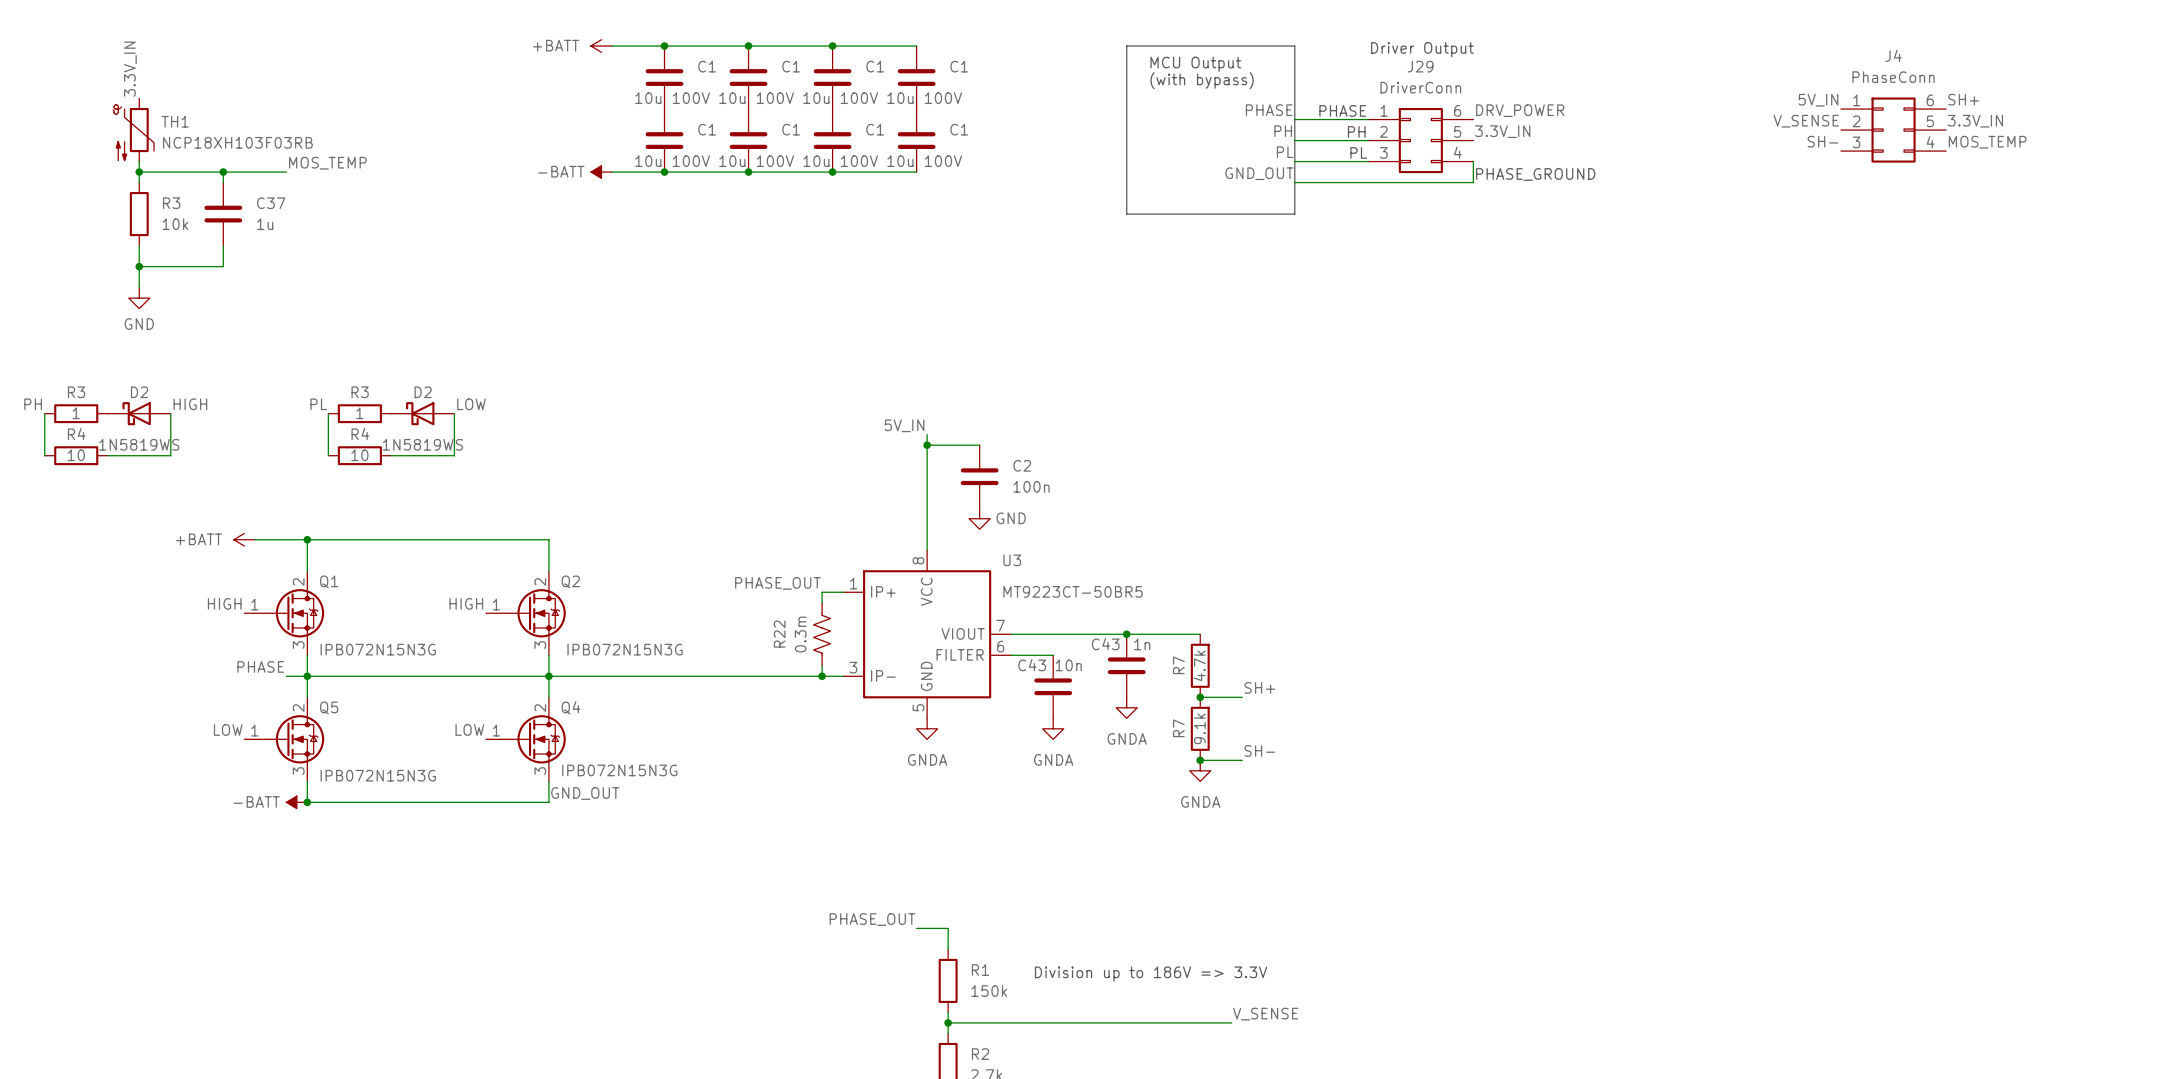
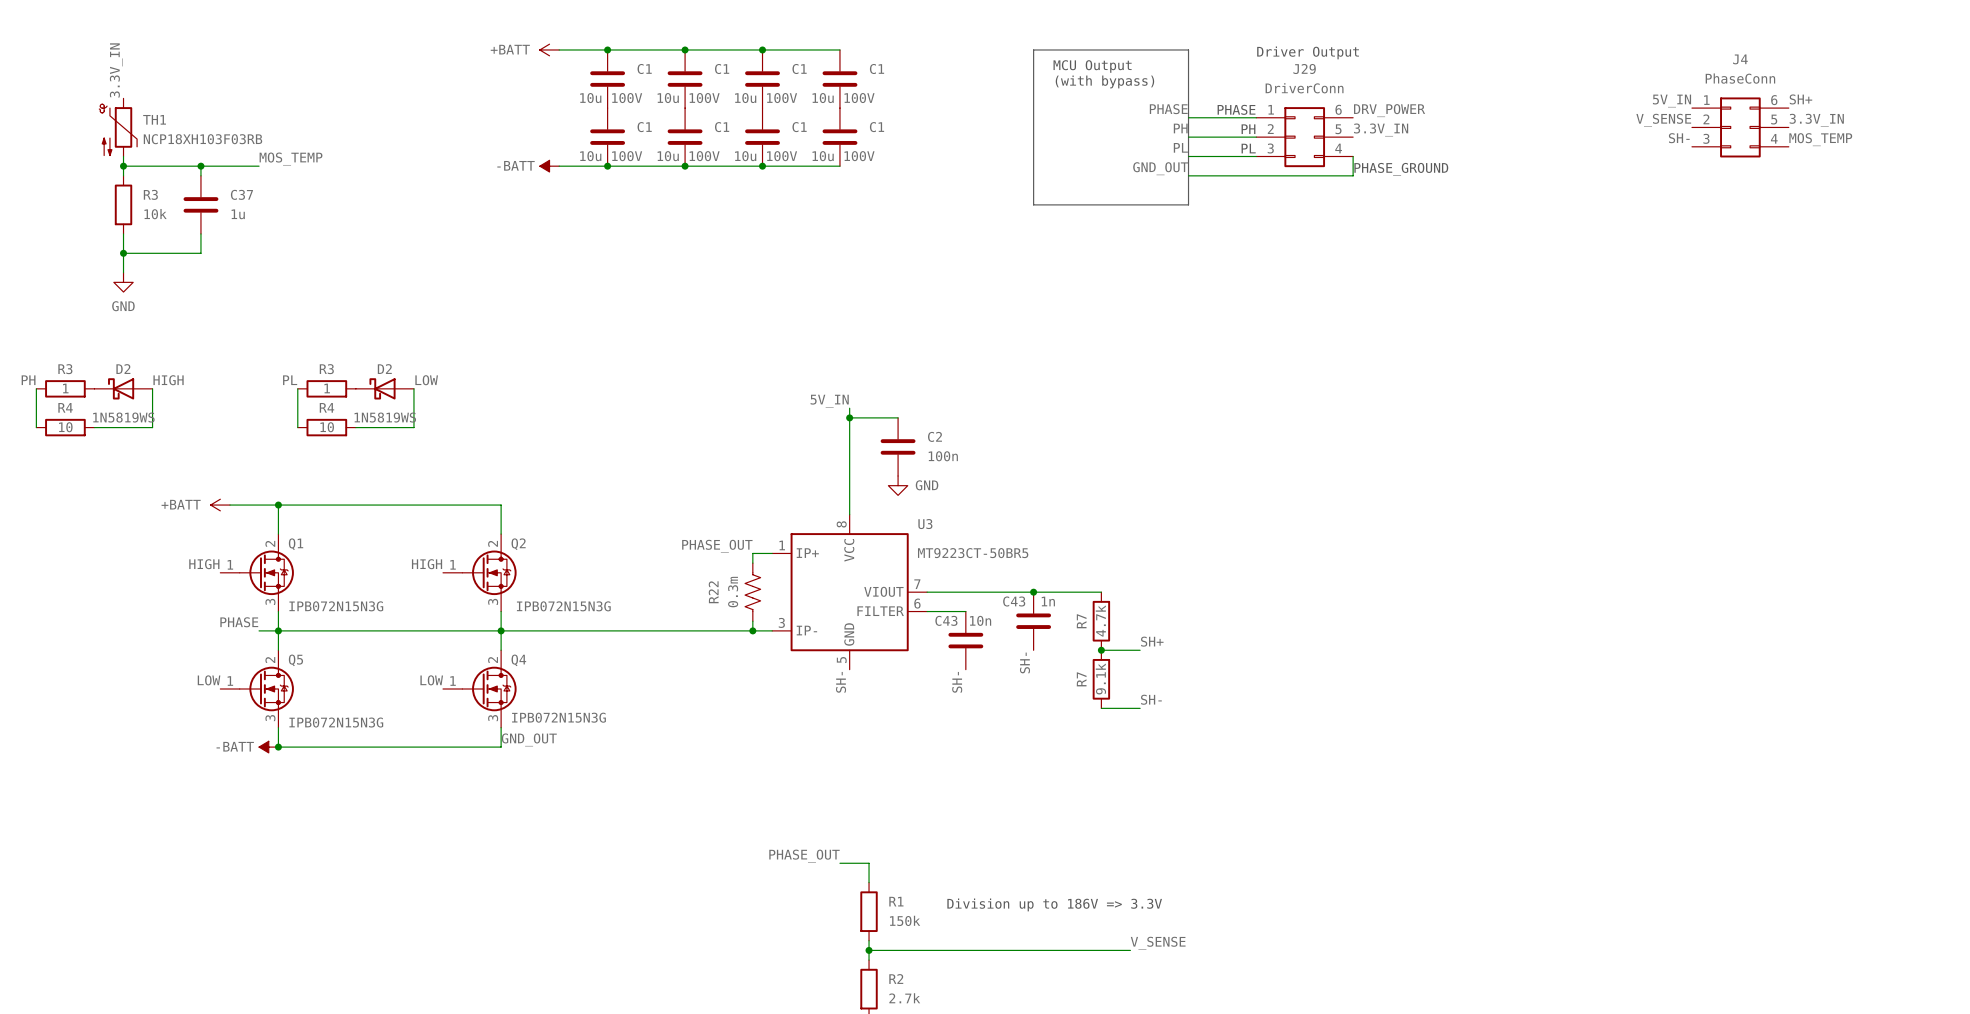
power symbol: GNDA (1126, 707) -> none
label: none -> SH- (1024, 662)
power symbol: GNDA (927, 728) -> none
power symbol: GNDA (1053, 728) -> none
label: none -> SH- (841, 682)
label: none -> SH- (957, 682)
junction: (1200, 760) -> none
power symbol: GNDA (1200, 770) -> none

